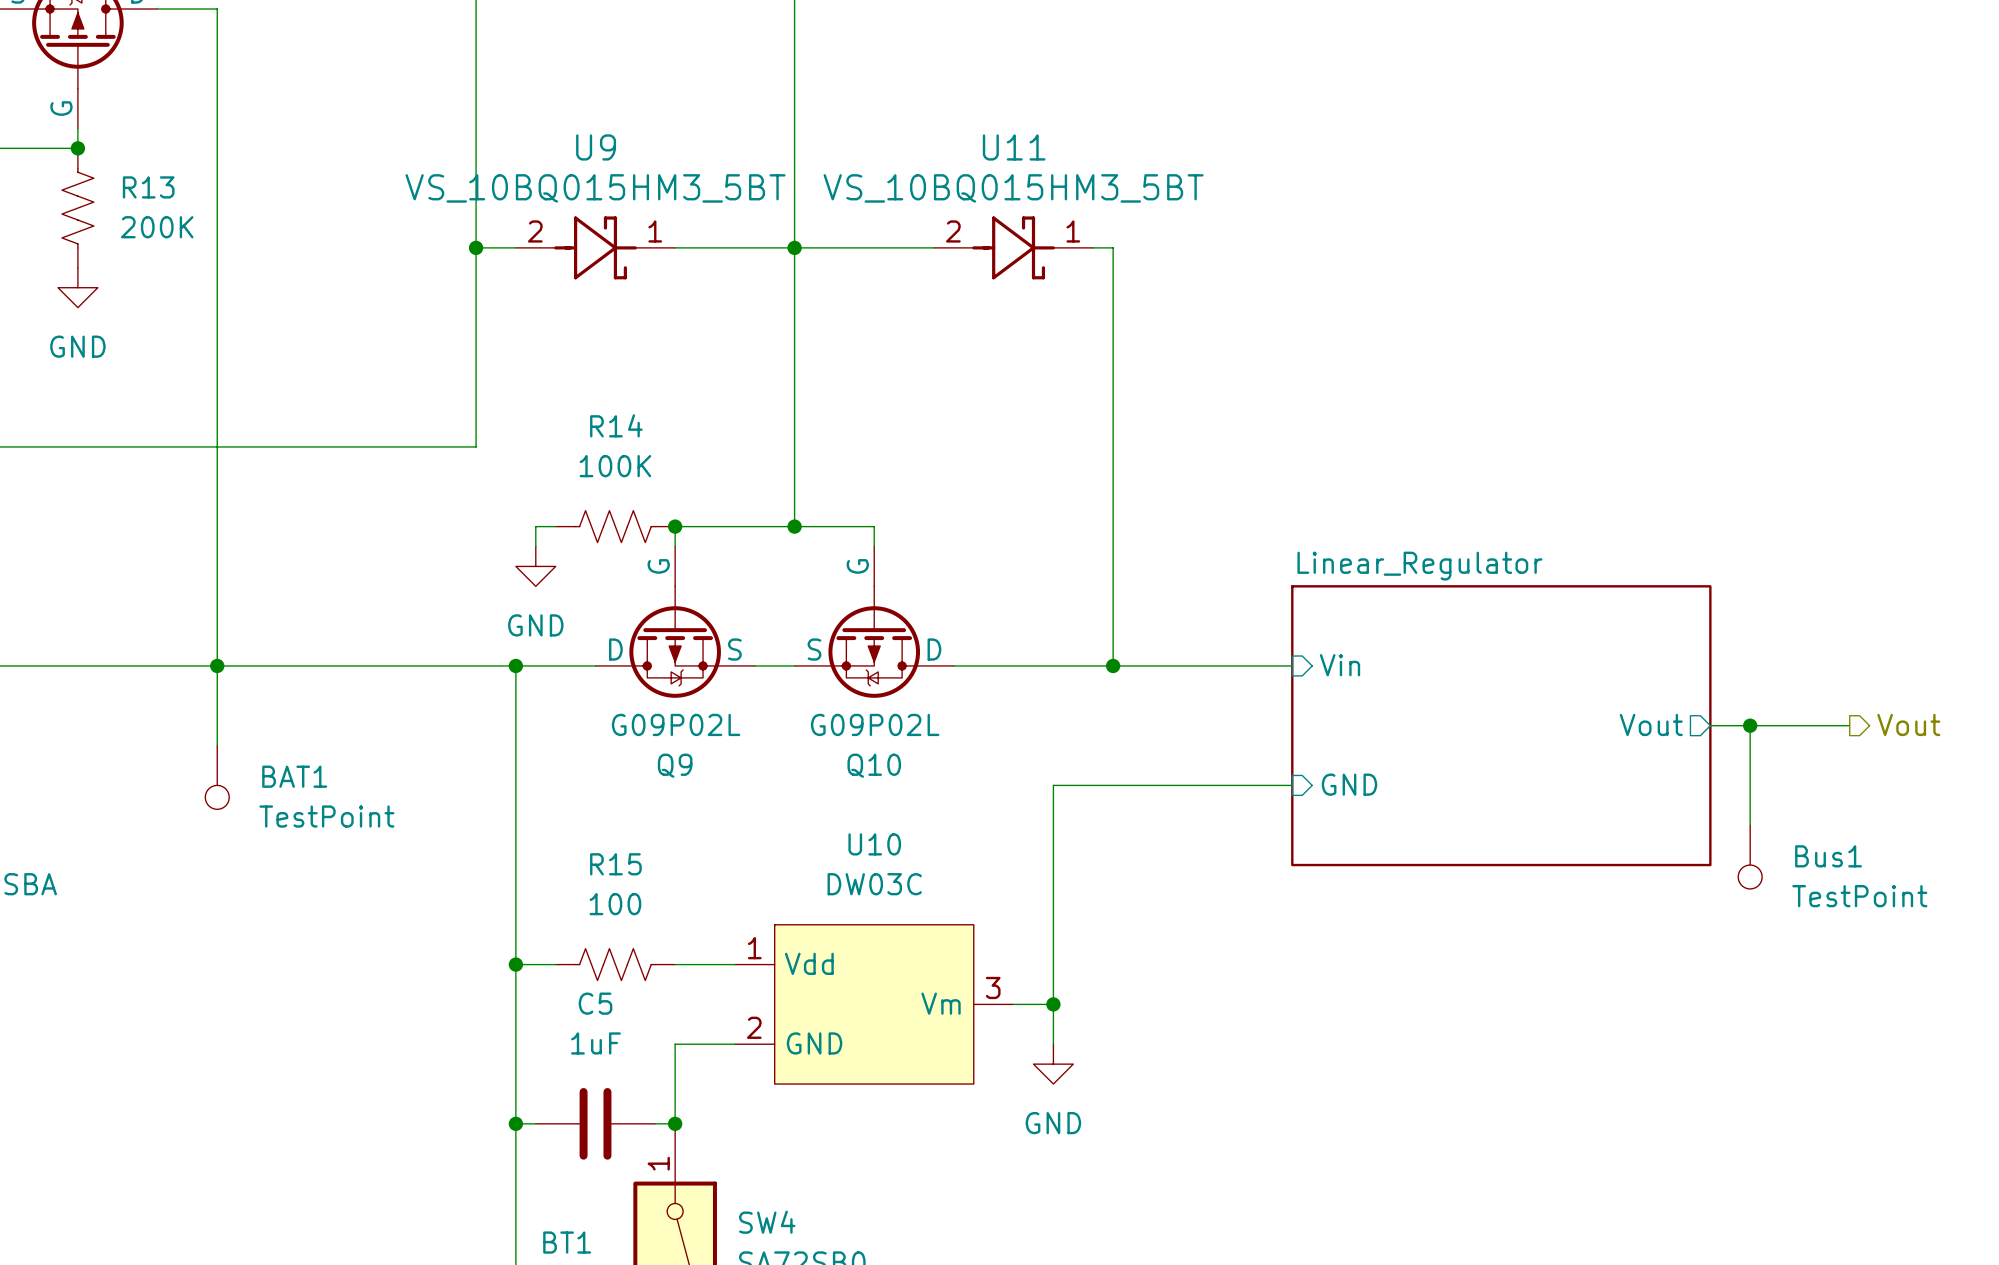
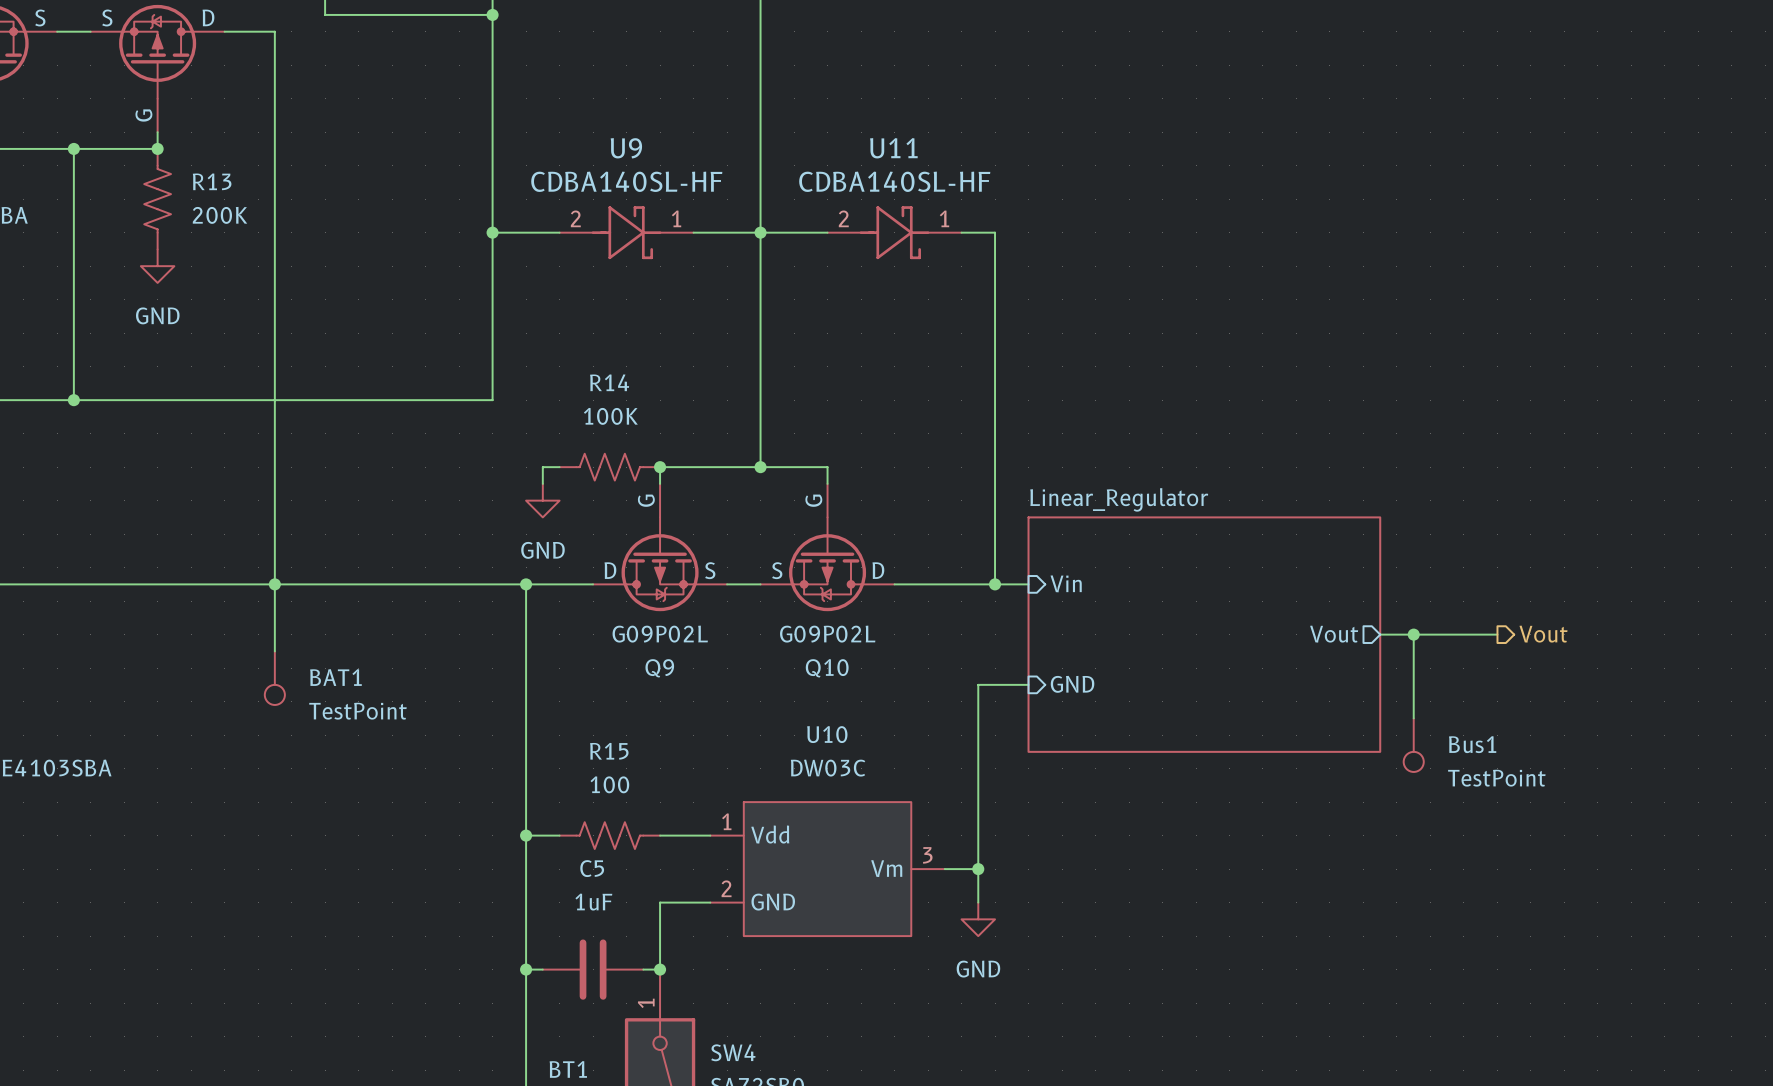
U9 value: VS_10BQ015HM3_5BT (595, 188) -> CDBA140SL-HF (626, 181)
U11 value: VS_10BQ015HM3_5BT (1013, 188) -> CDBA140SL-HF (894, 181)
U9 position: (595, 247) -> (626, 232)
U11 position: (1013, 247) -> (894, 232)
wire: none -> (961, 232) (995, 232) (995, 584)
wire: (1093, 247) (1113, 247) (1113, 665) (1292, 665) -> none
junction position: (1113, 665) -> (995, 584)
sheet pin position: Vin (1340, 665) -> Vin (1066, 583)
sheet pin position: Vout (1651, 724) -> Vout (1334, 634)
hierarchical label position: Vout (1908, 724) -> Vout (1543, 634)
sheet Linear_Regulator position: (1501, 725) -> (1204, 634)
junction: none -> (1413, 634)
wire: (1710, 725) (1849, 725) -> (1380, 634) (1497, 634)
wire: (1750, 725) (1750, 825) -> (1413, 634) (1413, 718)
junction: (1750, 725) -> none
sheet pin position: GND (1349, 784) -> GND (1072, 684)
wire: (1113, 785) (1292, 785) -> none
Bus1 position: (1750, 857) -> (1413, 745)

